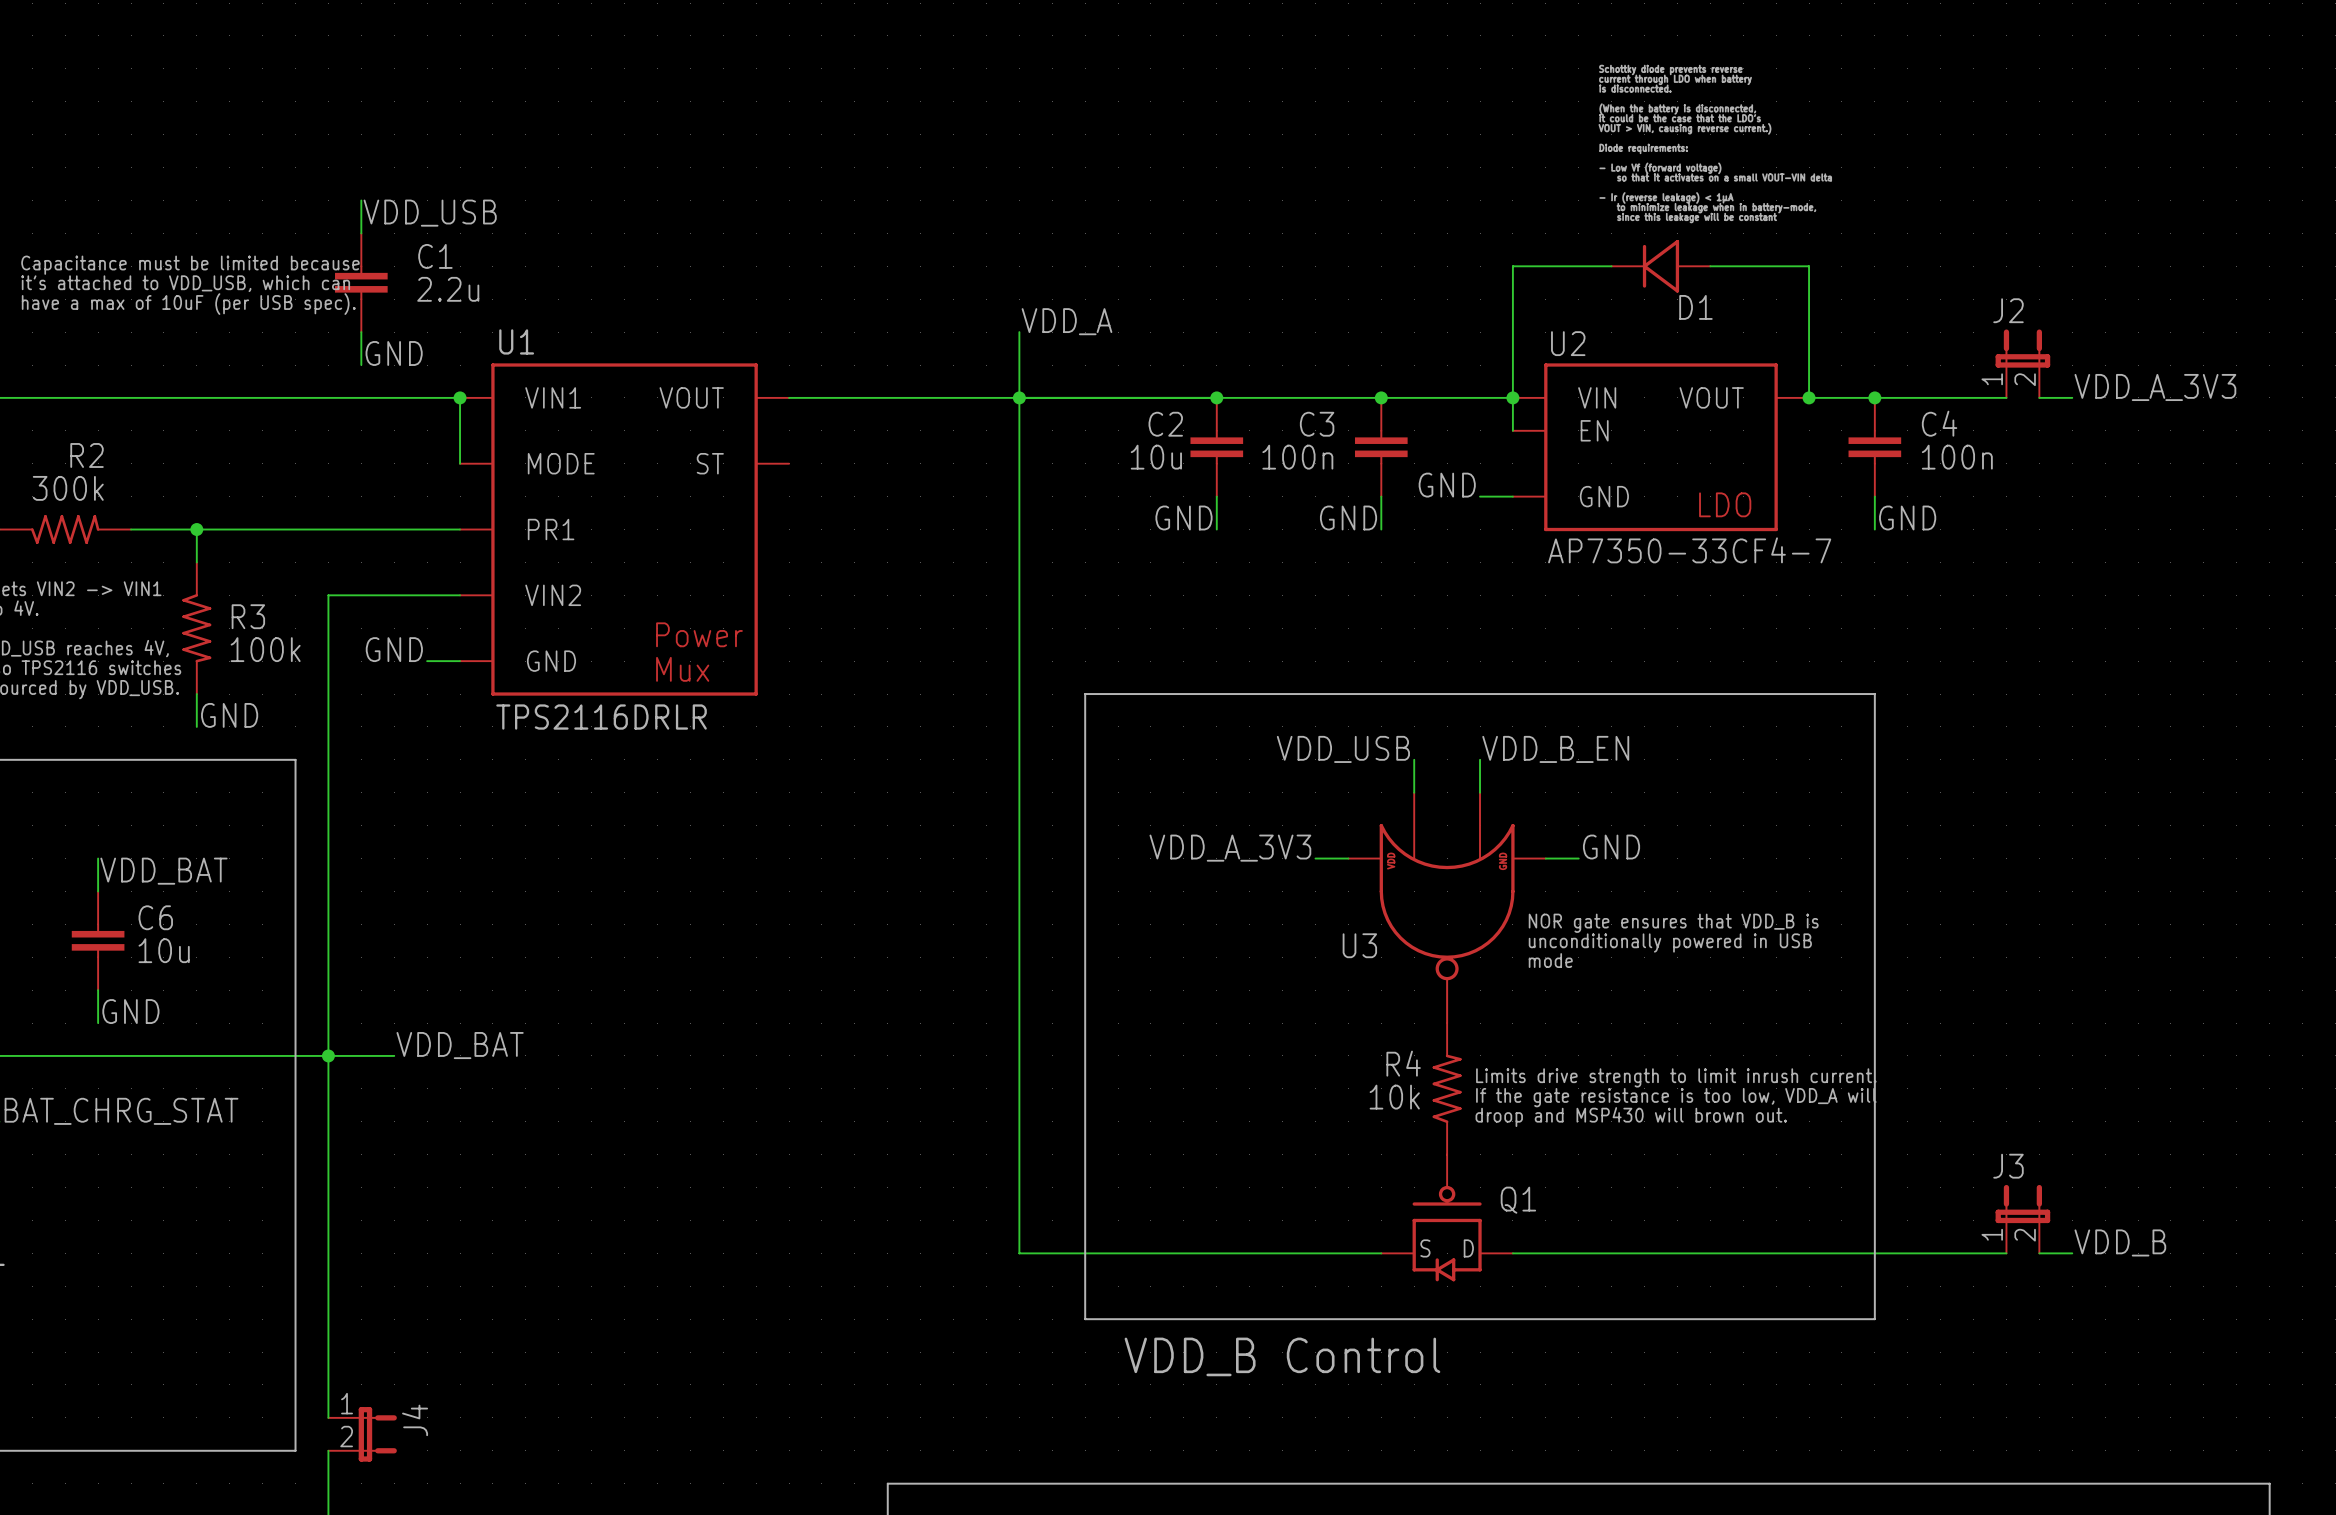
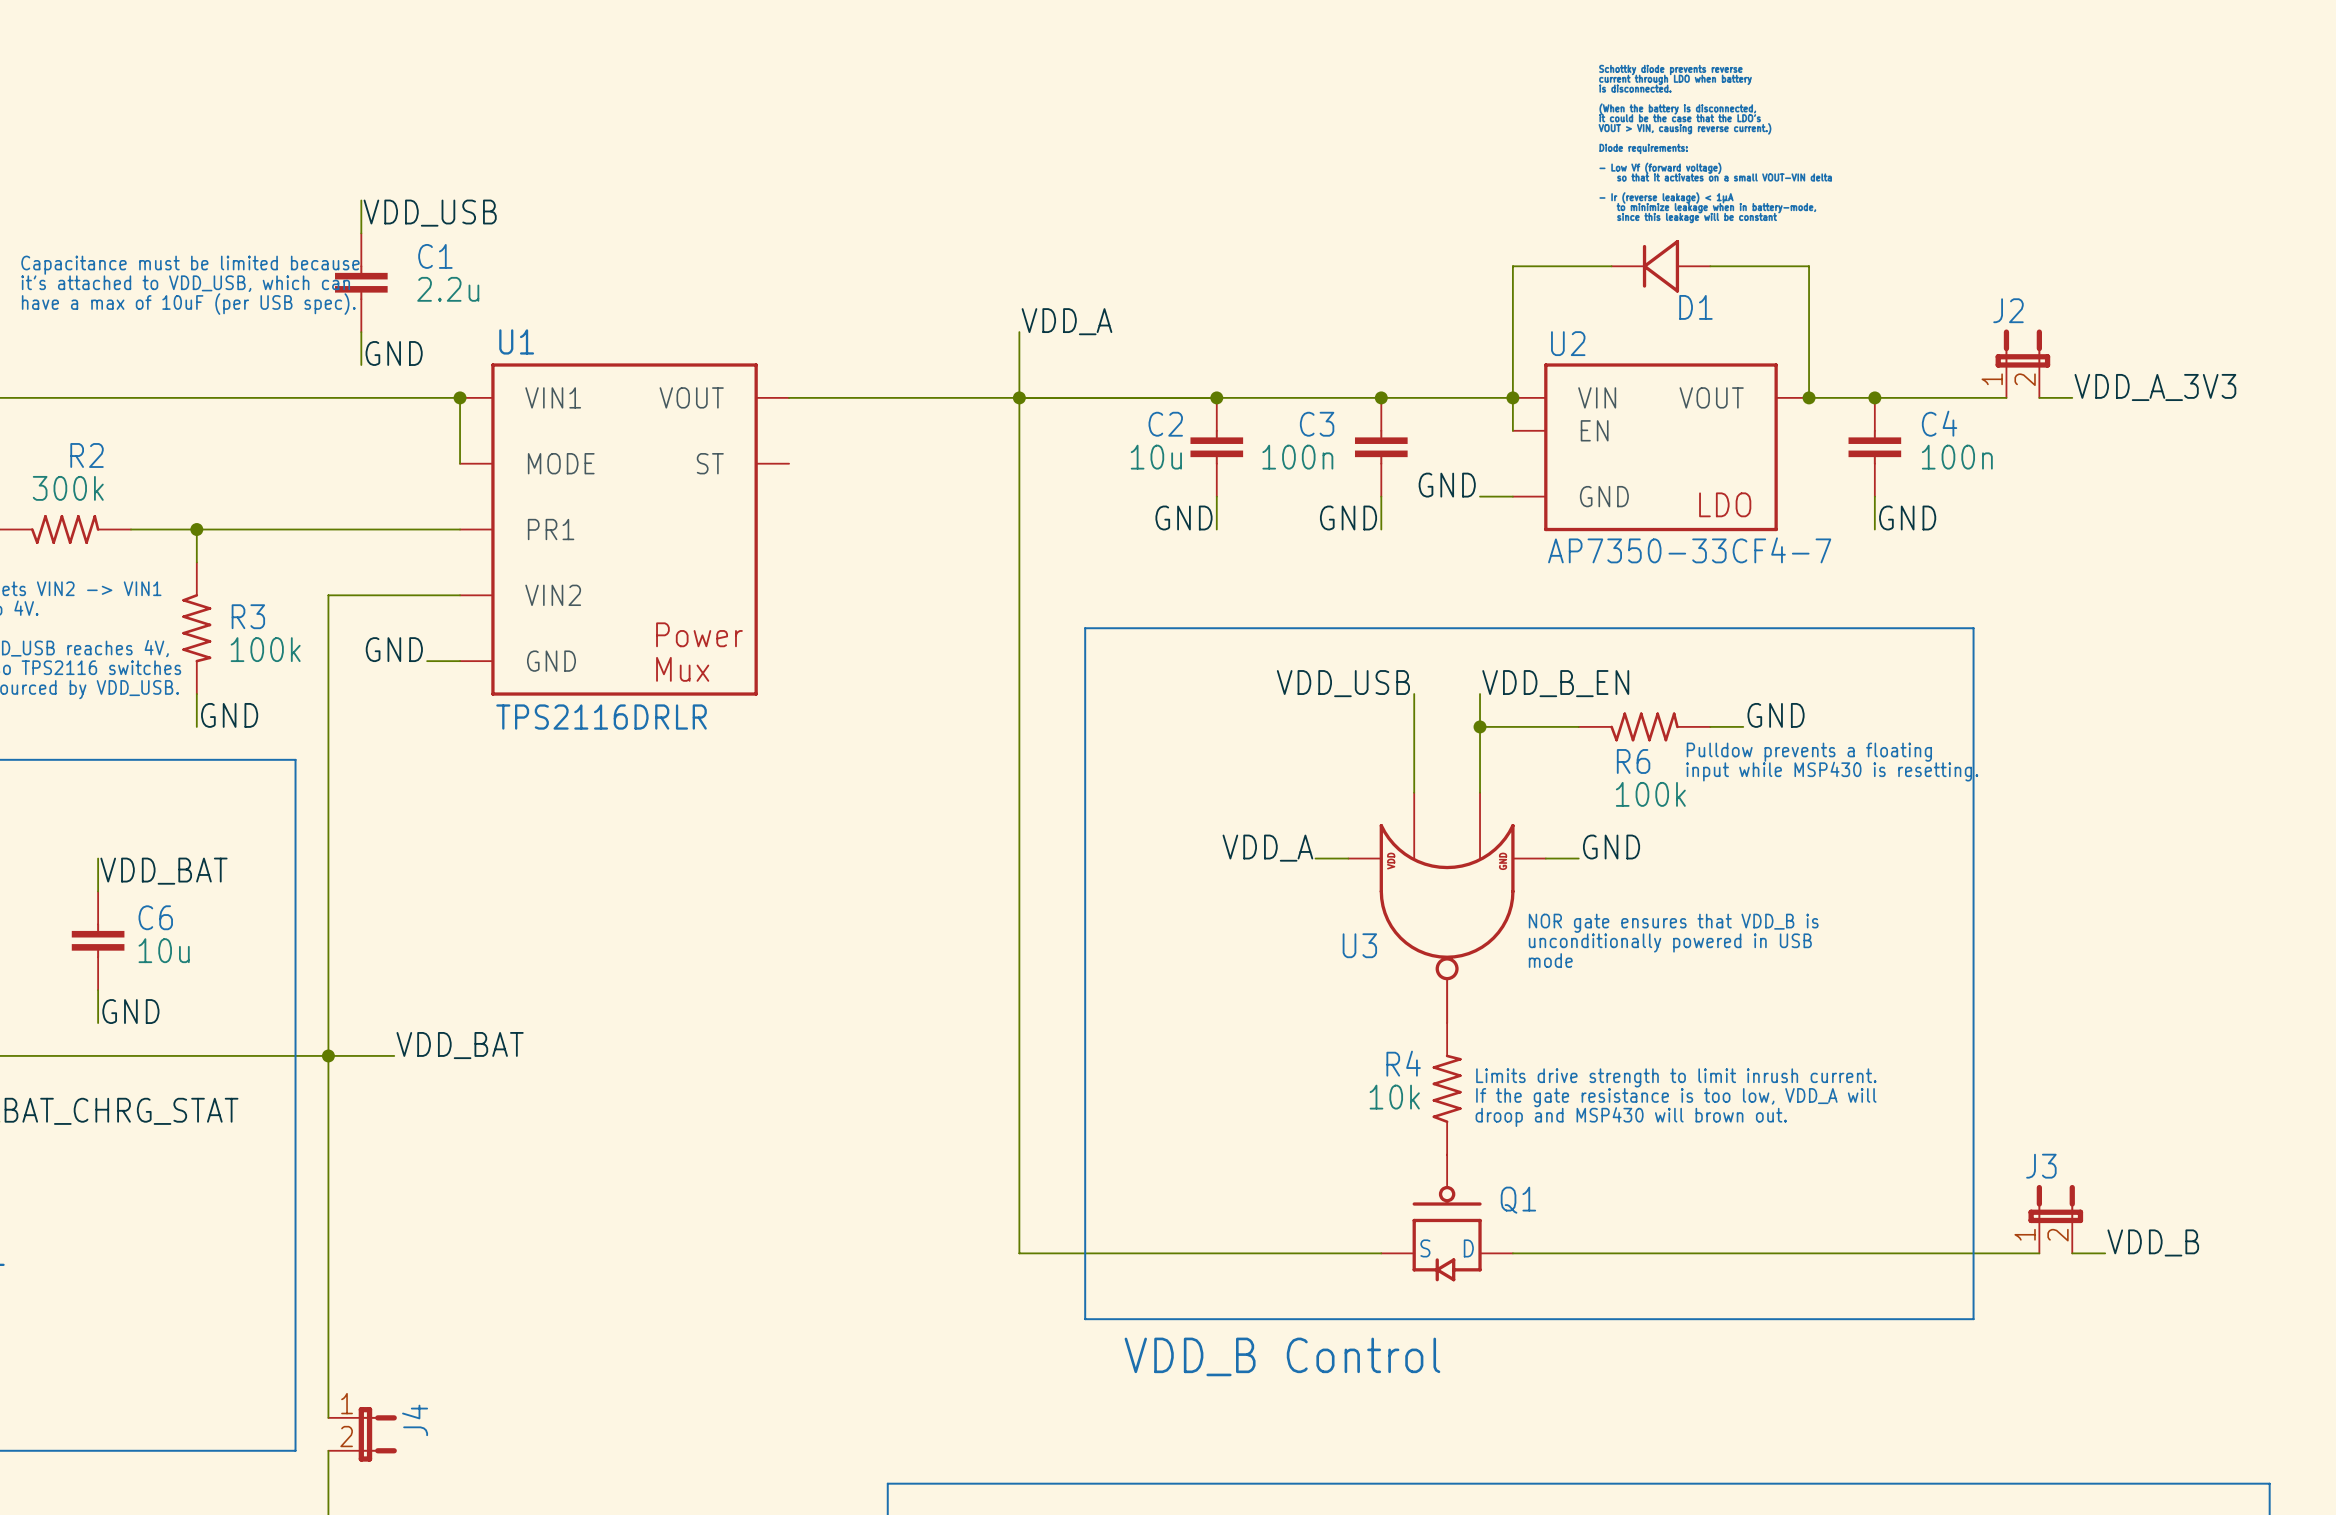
line: (1085, 694) (1874, 694) (1874, 1319) -> (1085, 694) (1085, 628) (1973, 628) (1973, 1319) (1874, 1319)
wire: none -> (1414, 694) (1414, 759)
wire: none -> (1480, 694) (1480, 759)
label: none -> GND (1776, 715)
wire: none -> (1480, 726) (1578, 726)
junction: none -> (1480, 726)
R6: none -> 100k (1644, 726)
wire: none -> (1710, 726) (1743, 726)
label position: VDD_USB (1343, 749) -> VDD_USB (1343, 683)
label position: VDD_B_EN (1555, 749) -> VDD_B_EN (1555, 683)
text: none -> Pulldow prevents a floating (1809, 752)
text: none -> input while MSP430 is resetting. (1832, 771)
label: VDD_A_3V3 (1230, 848) -> VDD_A (1267, 848)
J3 position: (2022, 1219) -> (2055, 1219)
label position: VDD_B (2120, 1242) -> VDD_B (2153, 1242)
wire: none -> (2006, 1253) (2039, 1253)
wire: (2039, 1253) (2072, 1253) -> (2105, 1253) (2072, 1253)

